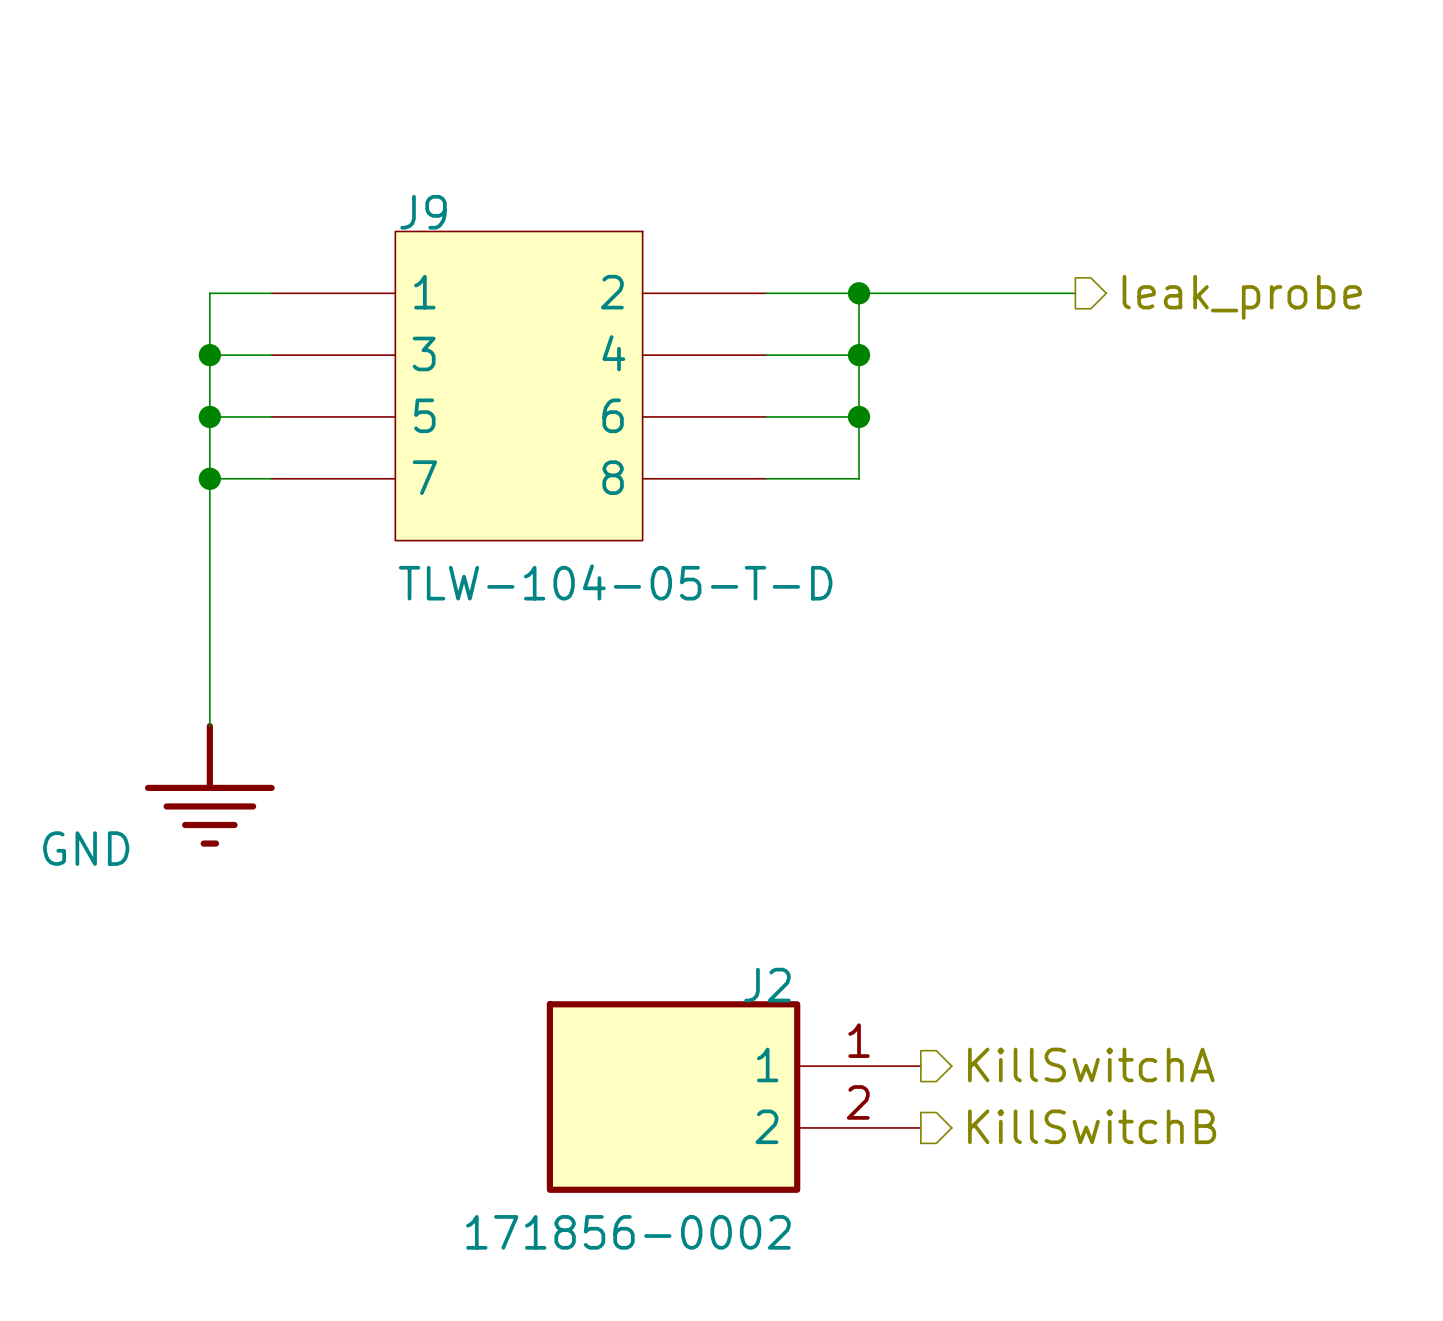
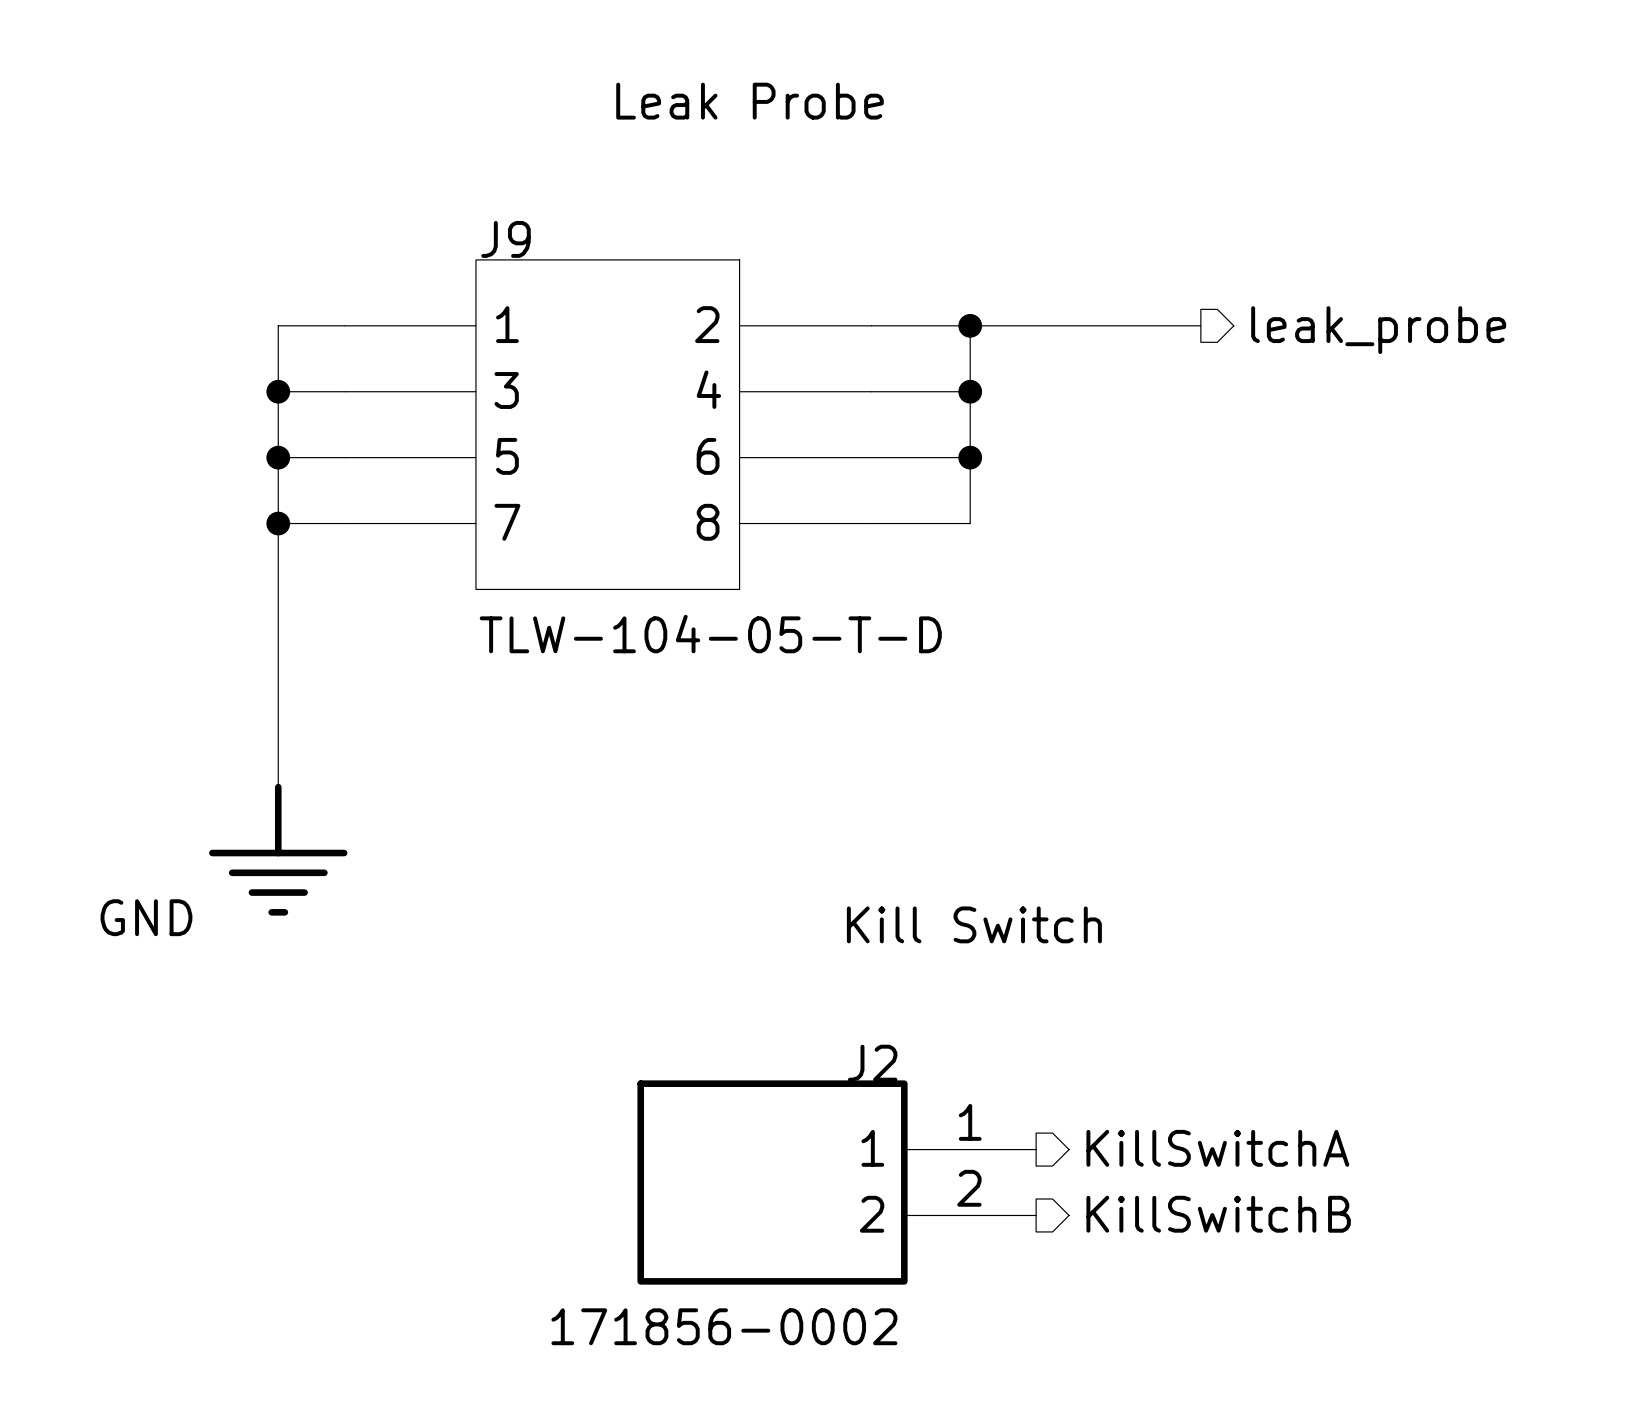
text: none -> Leak Probe (750, 101)
text: none -> Kill Switch (974, 924)

